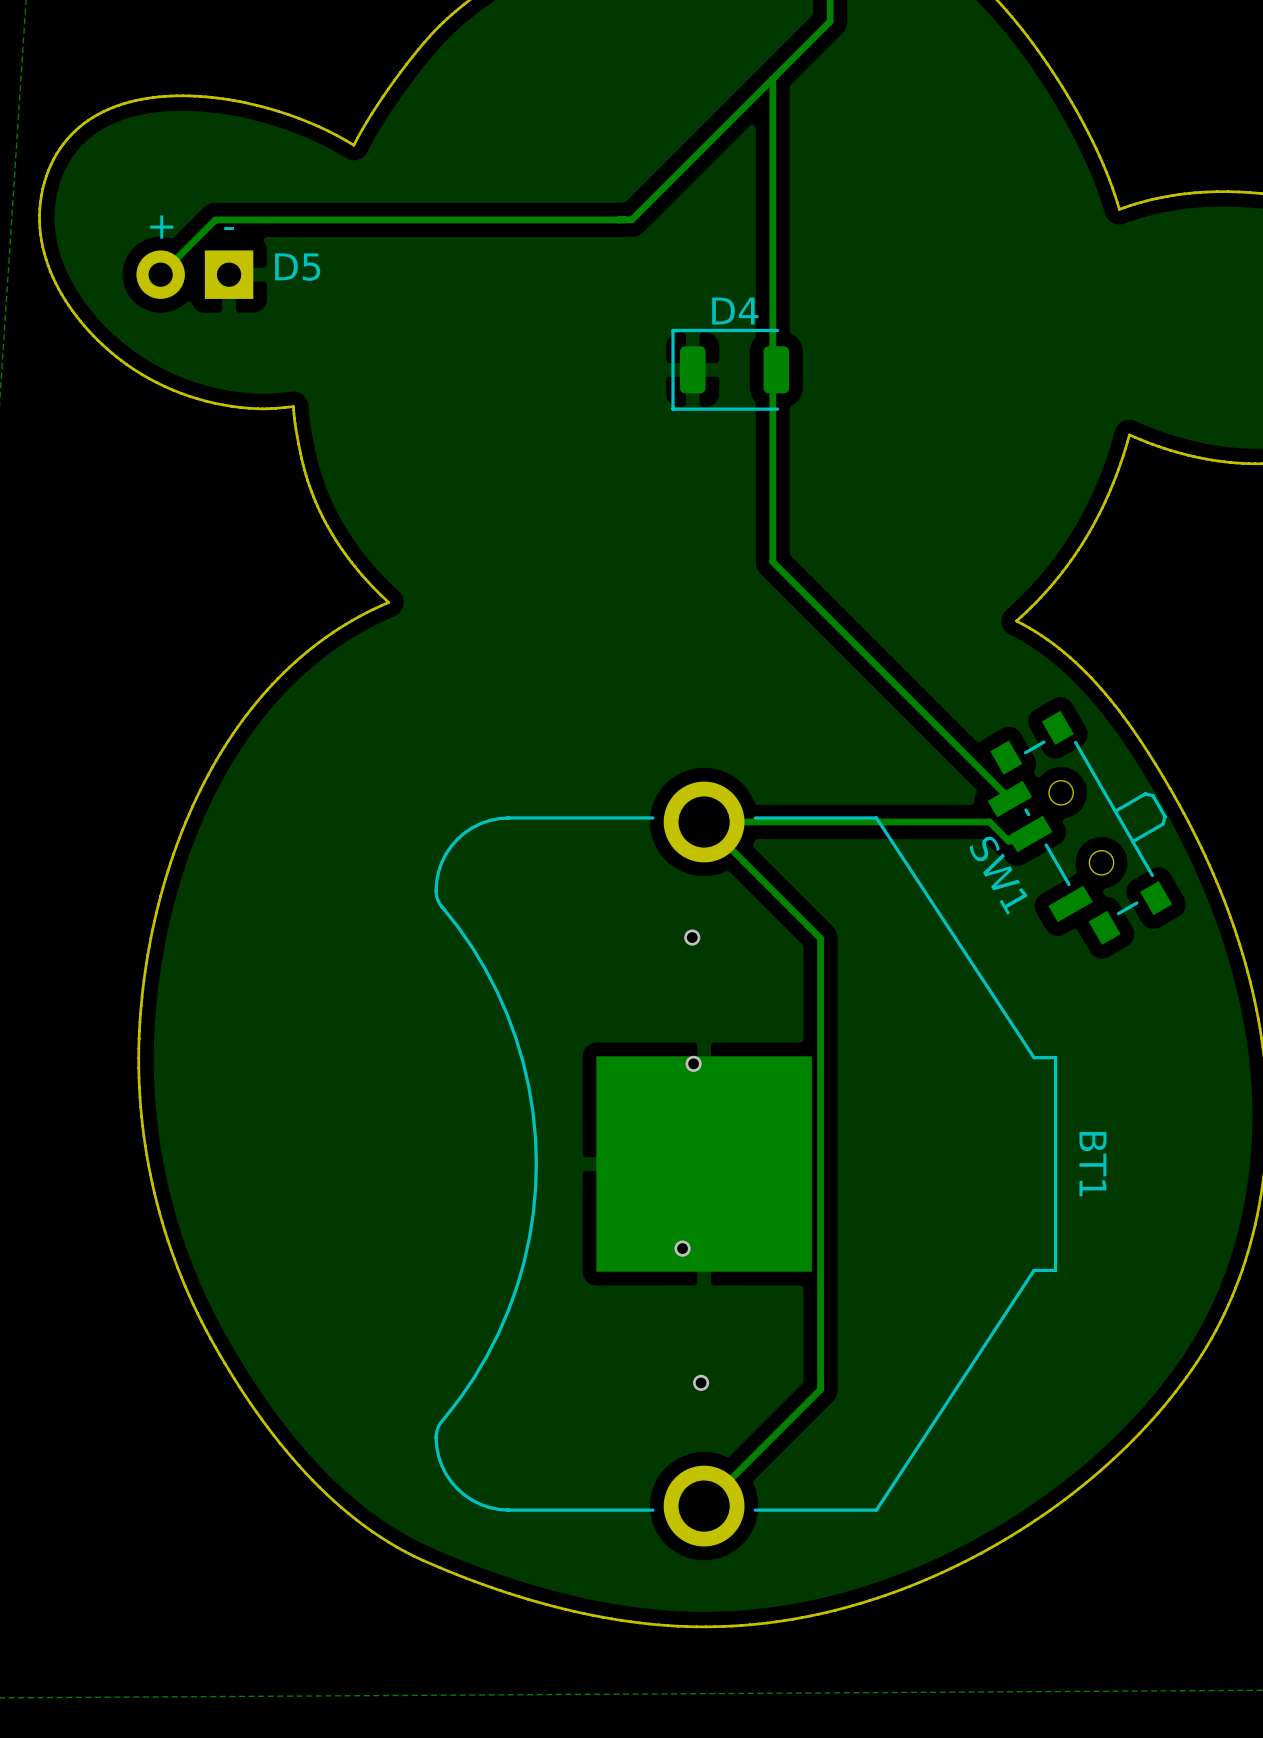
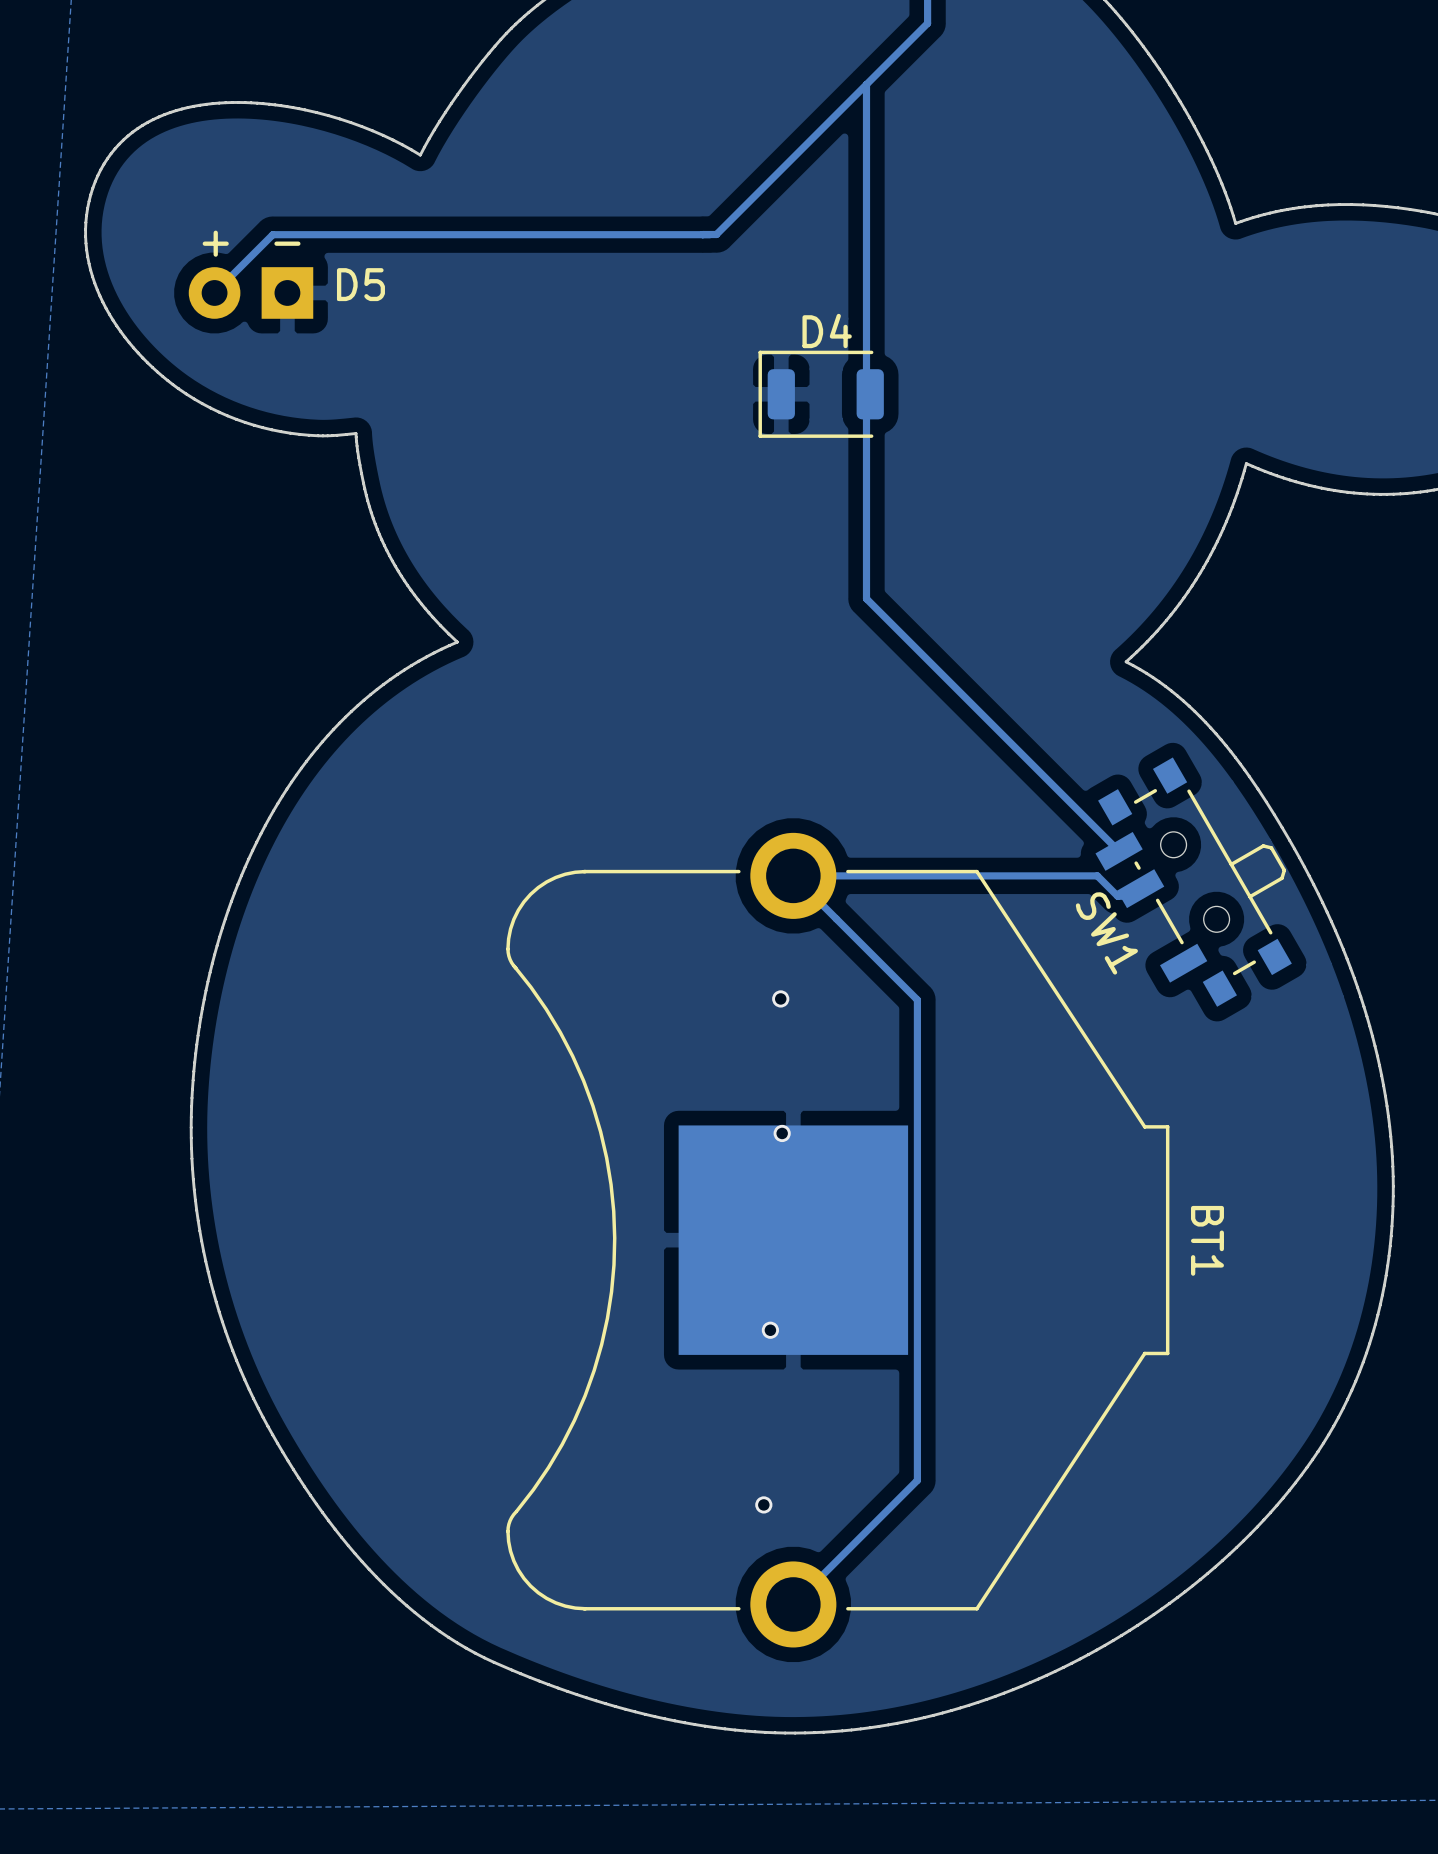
via position: (701, 1382) -> (763, 1504)

